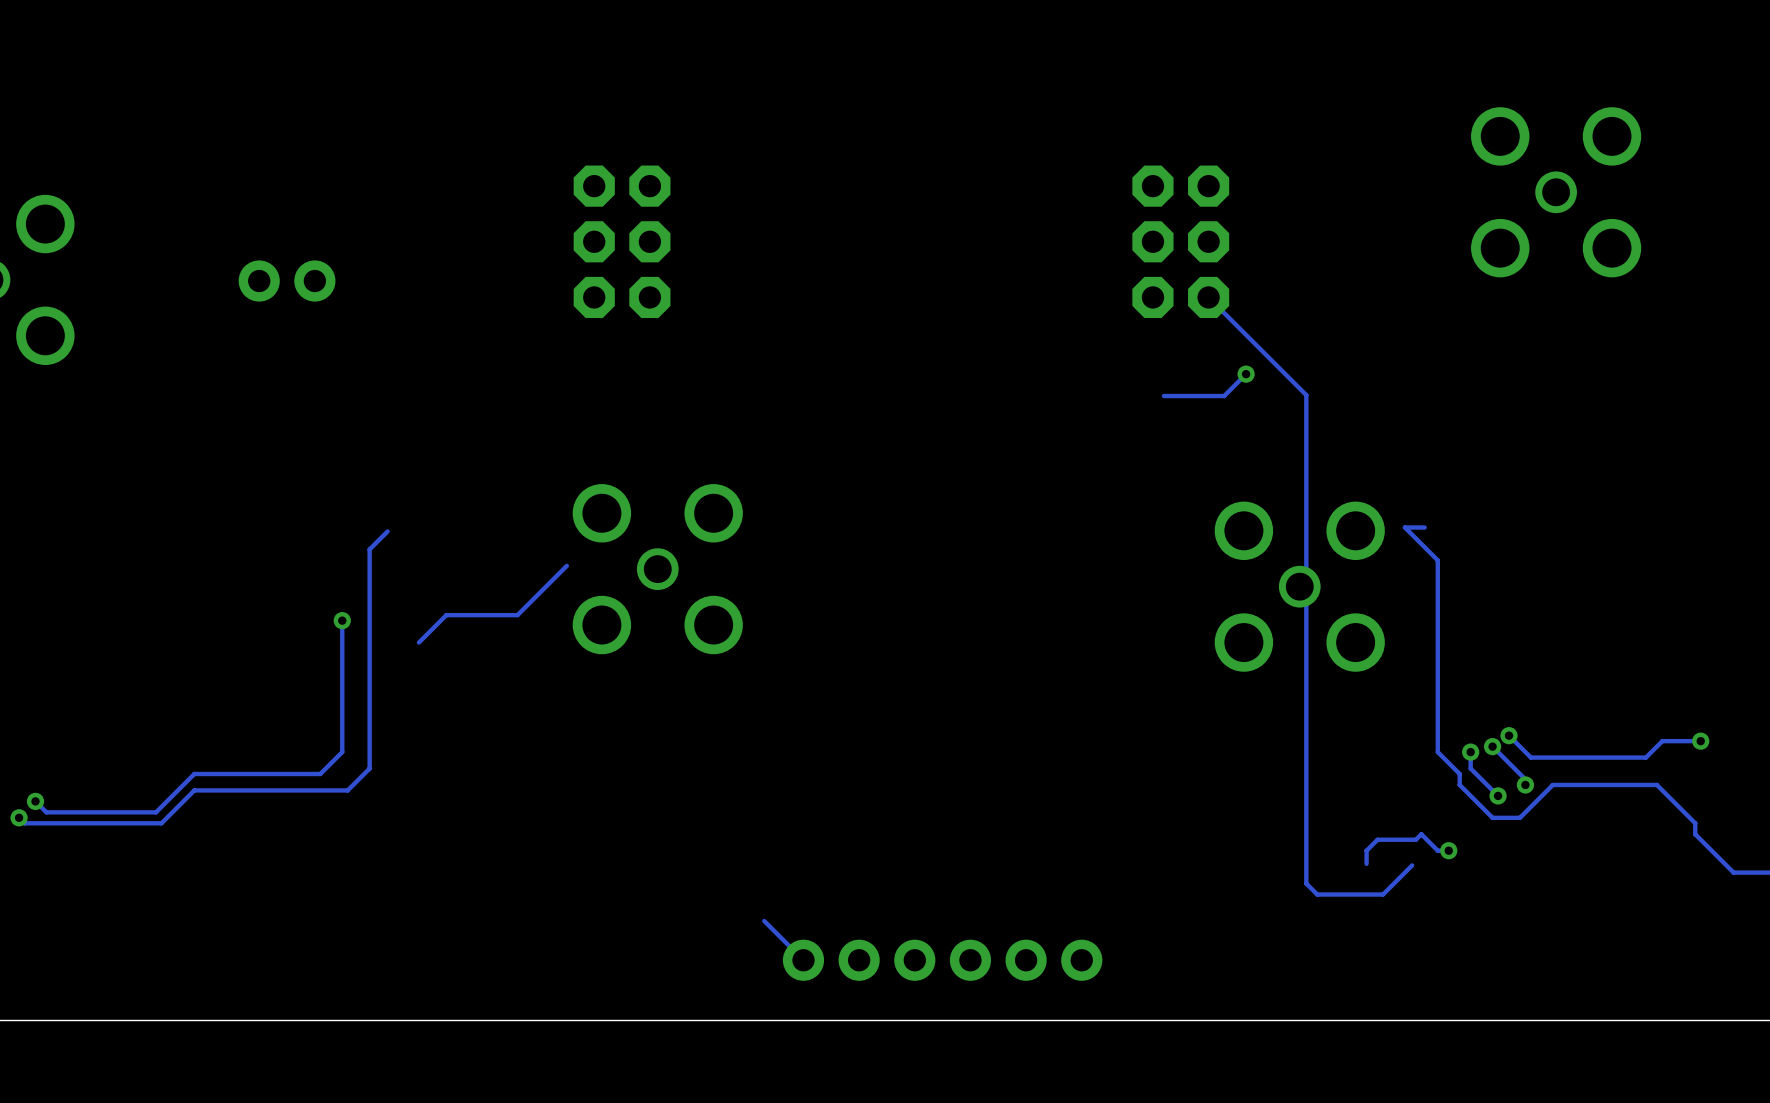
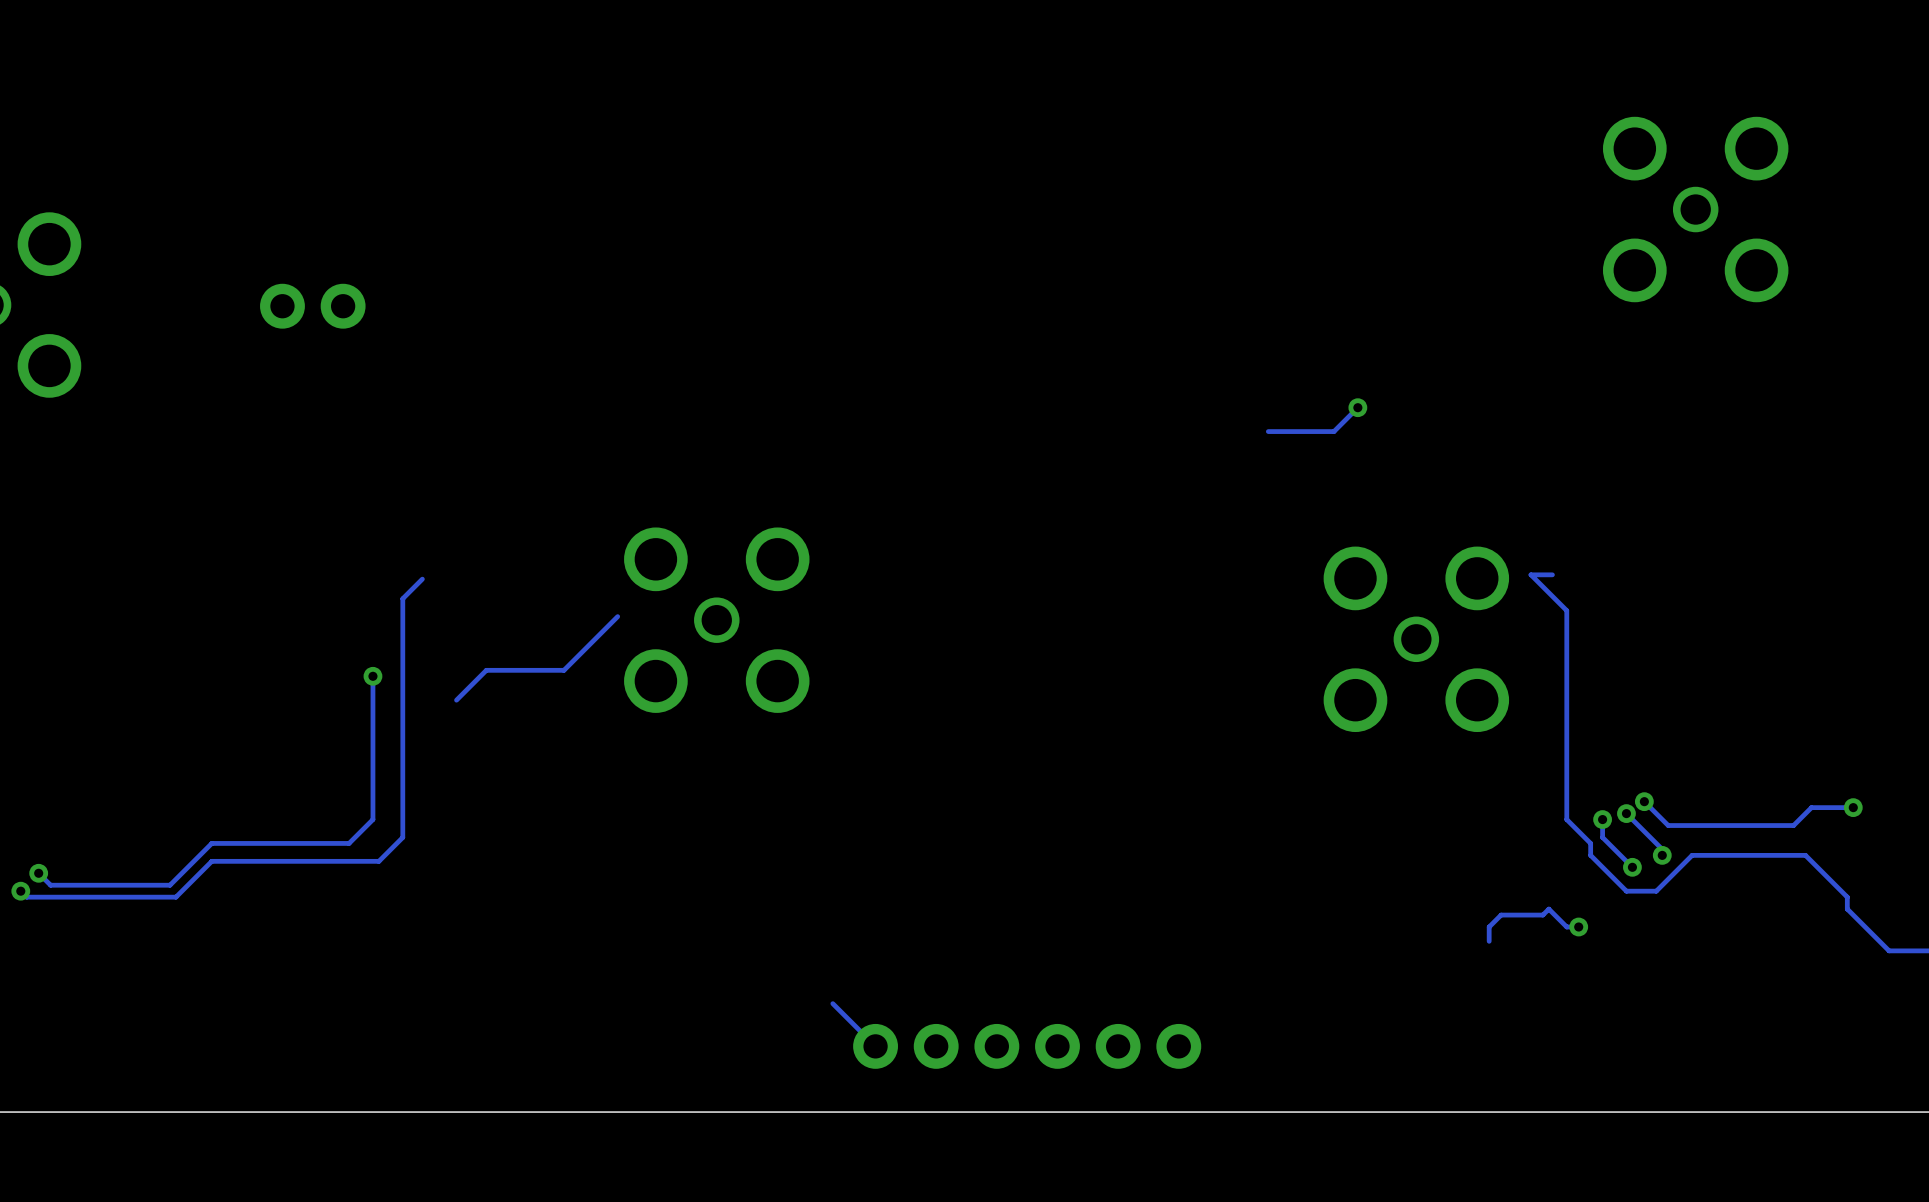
part: (622, 241) -> none
part: (1180, 241) -> none
track: (1208, 297) (1306, 395) (1306, 883) (1317, 894) (1383, 894) (1412, 865) -> none

